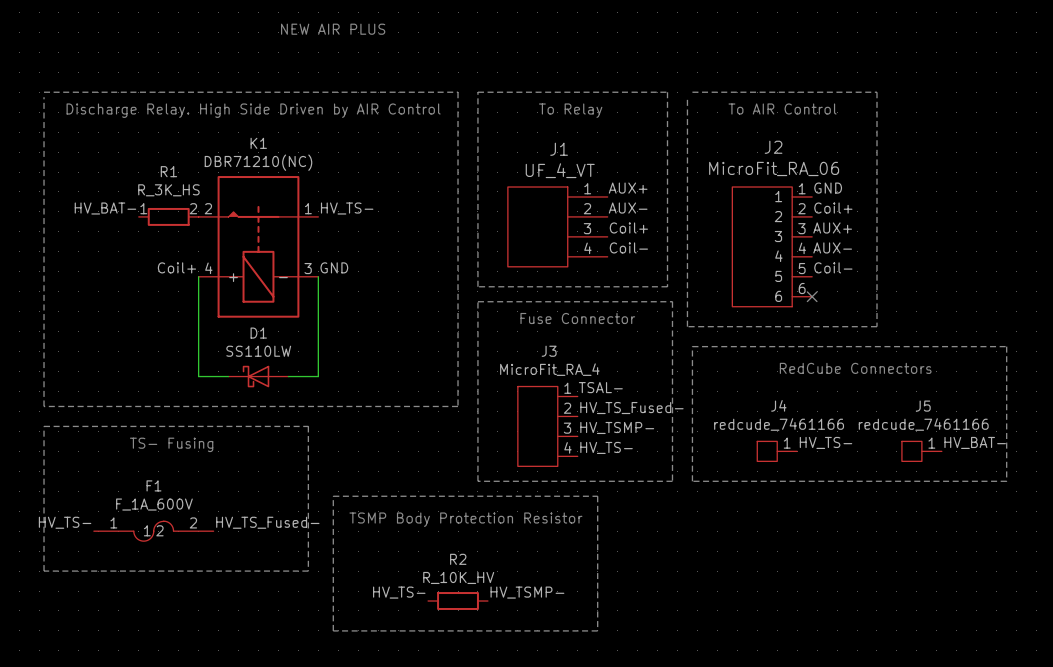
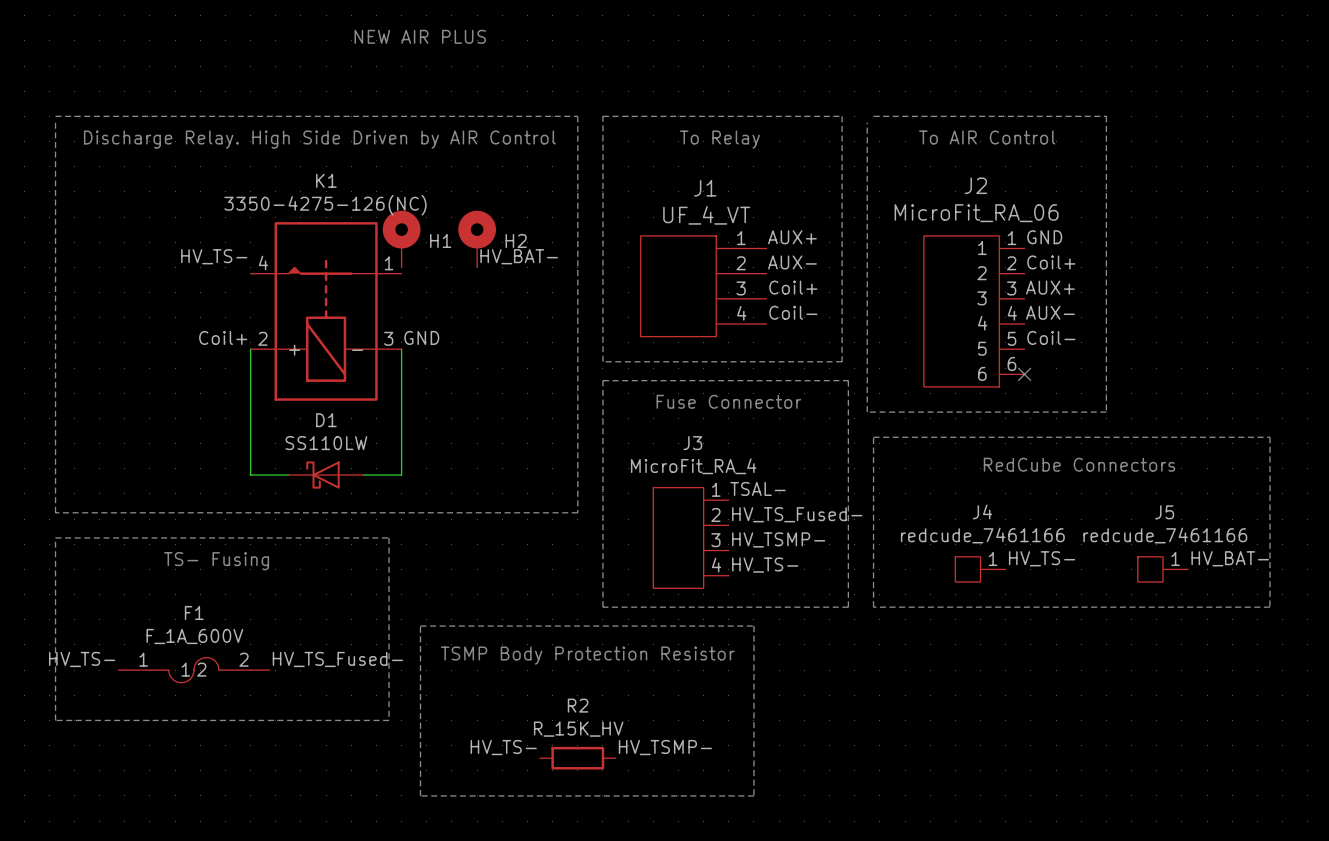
K1 value: DBR71210(NC) (258, 162) -> 3350-4275-126(NC) (325, 205)
H1: none -> (401, 239)
H2: none -> (477, 239)
label: none -> HV_BAT- (519, 256)
label: HV_BAT- (105, 208) -> none
K1 pin number: 2 (208, 208) -> 4 (263, 262)
label position: HV_TS- (347, 208) -> HV_TS- (214, 256)
R1: R_3K_HS (168, 216) -> none
K1 pin number: 4 (208, 268) -> 2 (262, 338)
R2 value: R_10K_HV (458, 577) -> R_15K_HV (578, 729)

